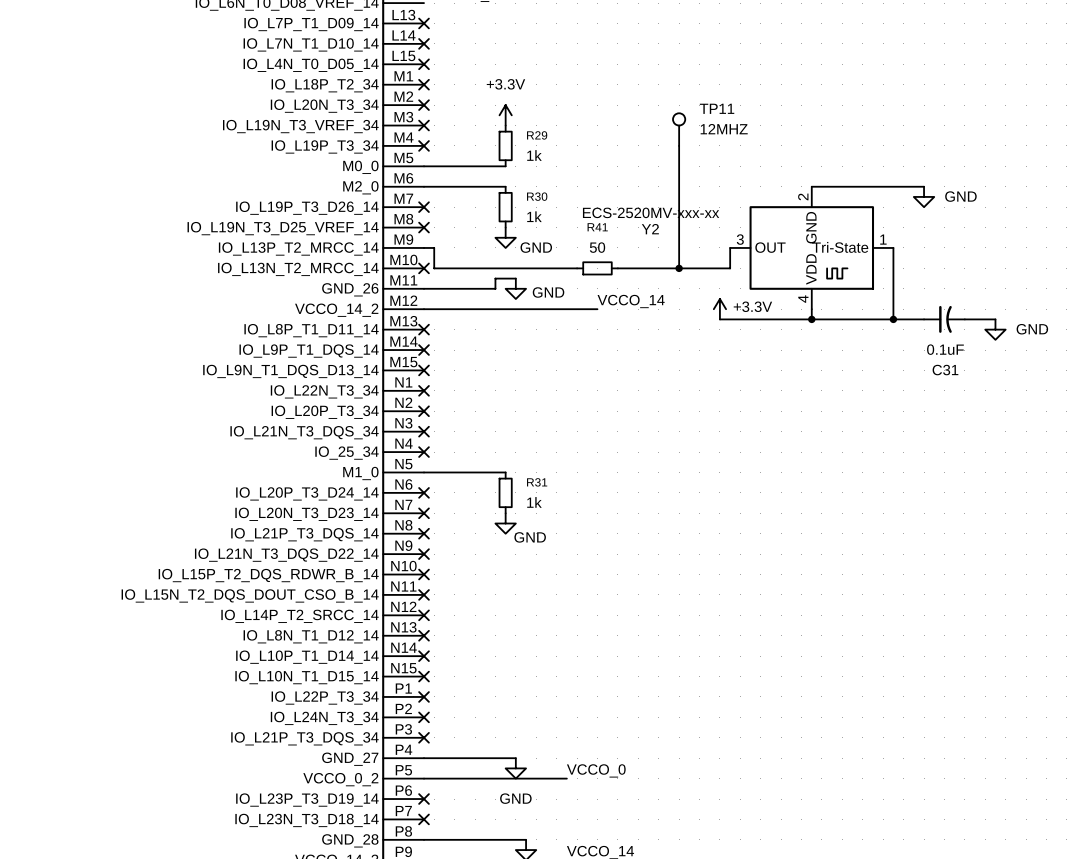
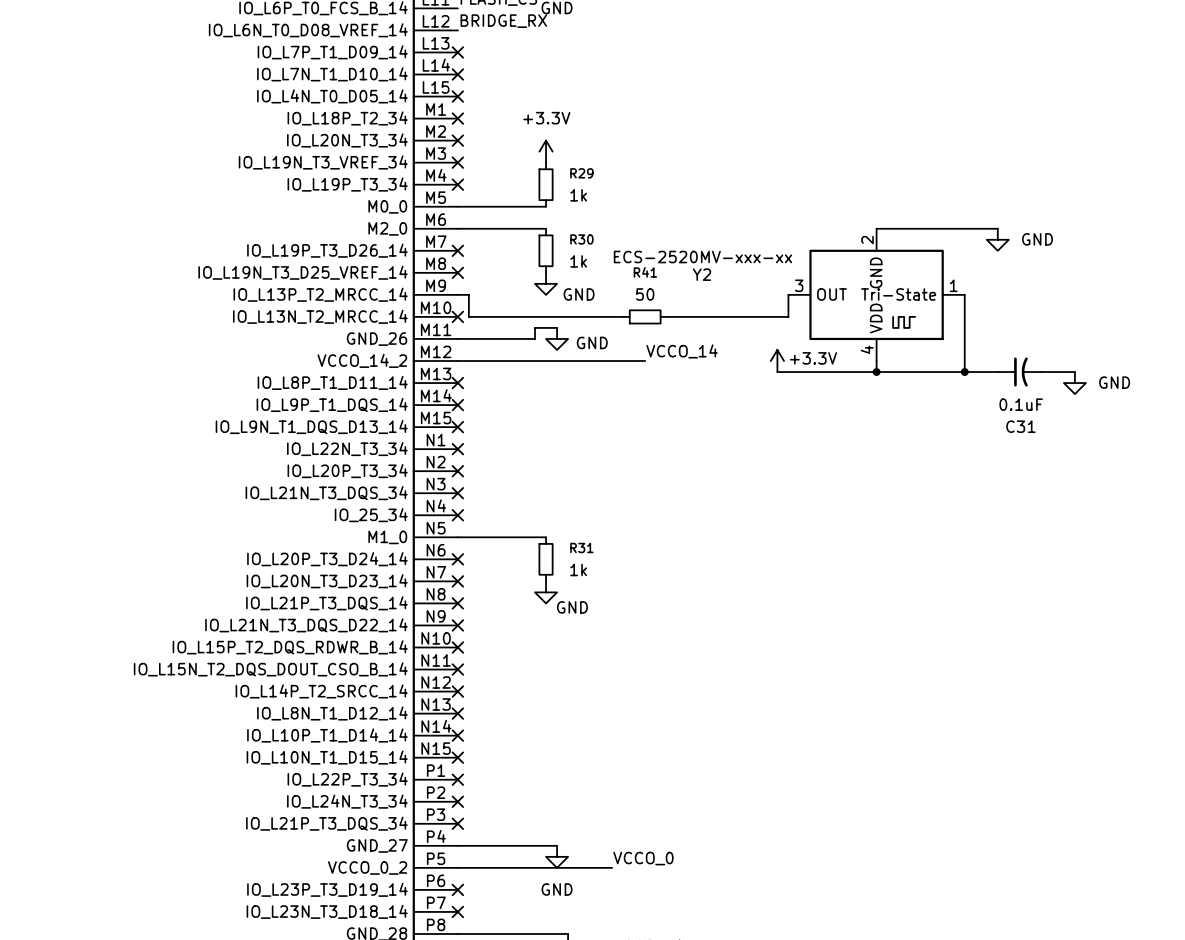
TP11: 12MHZ (679, 129) -> none
wire: (679, 145) (679, 268) -> none
junction: (679, 268) -> none

